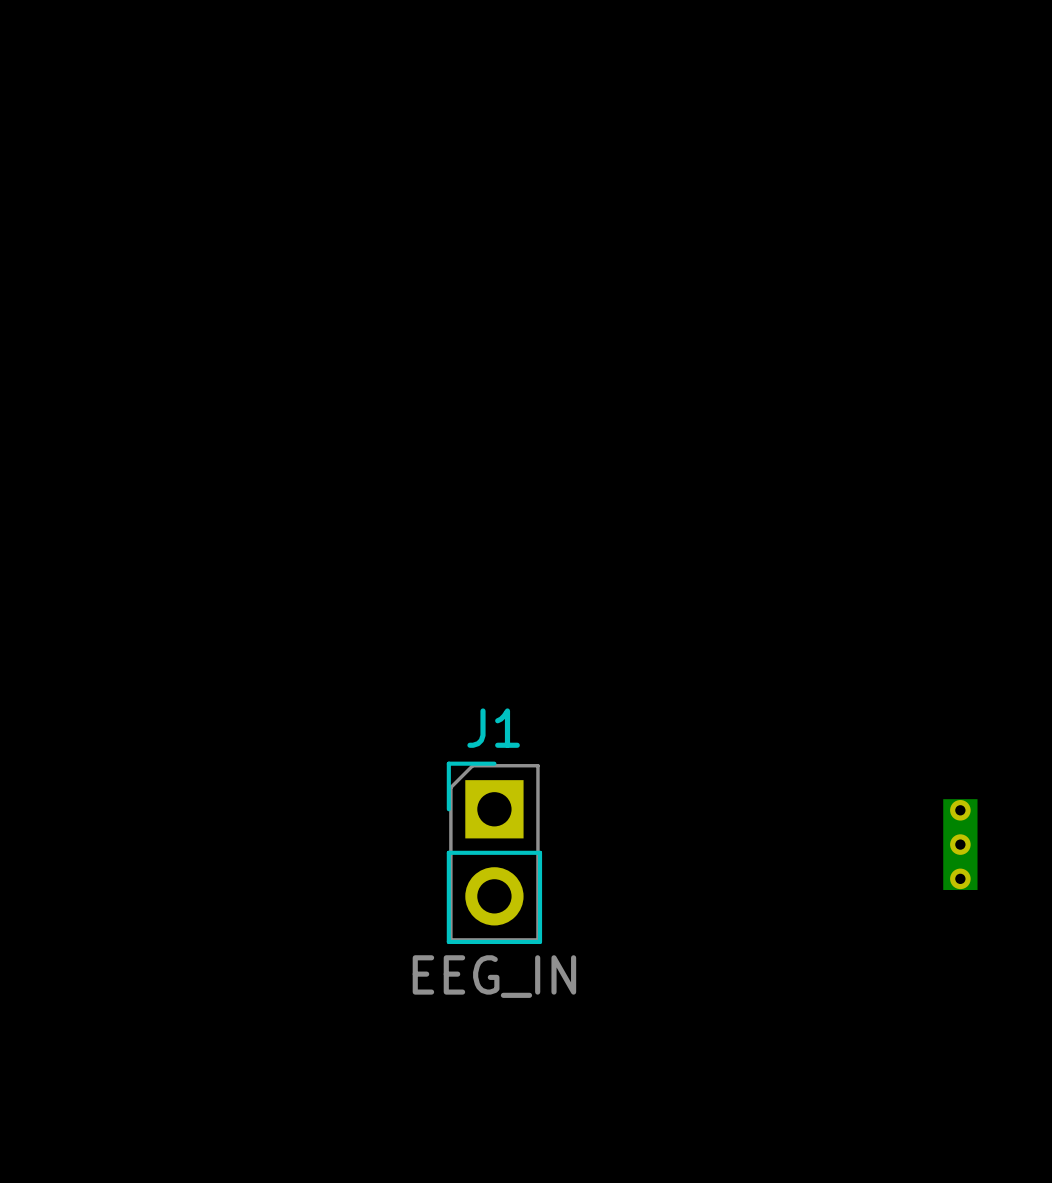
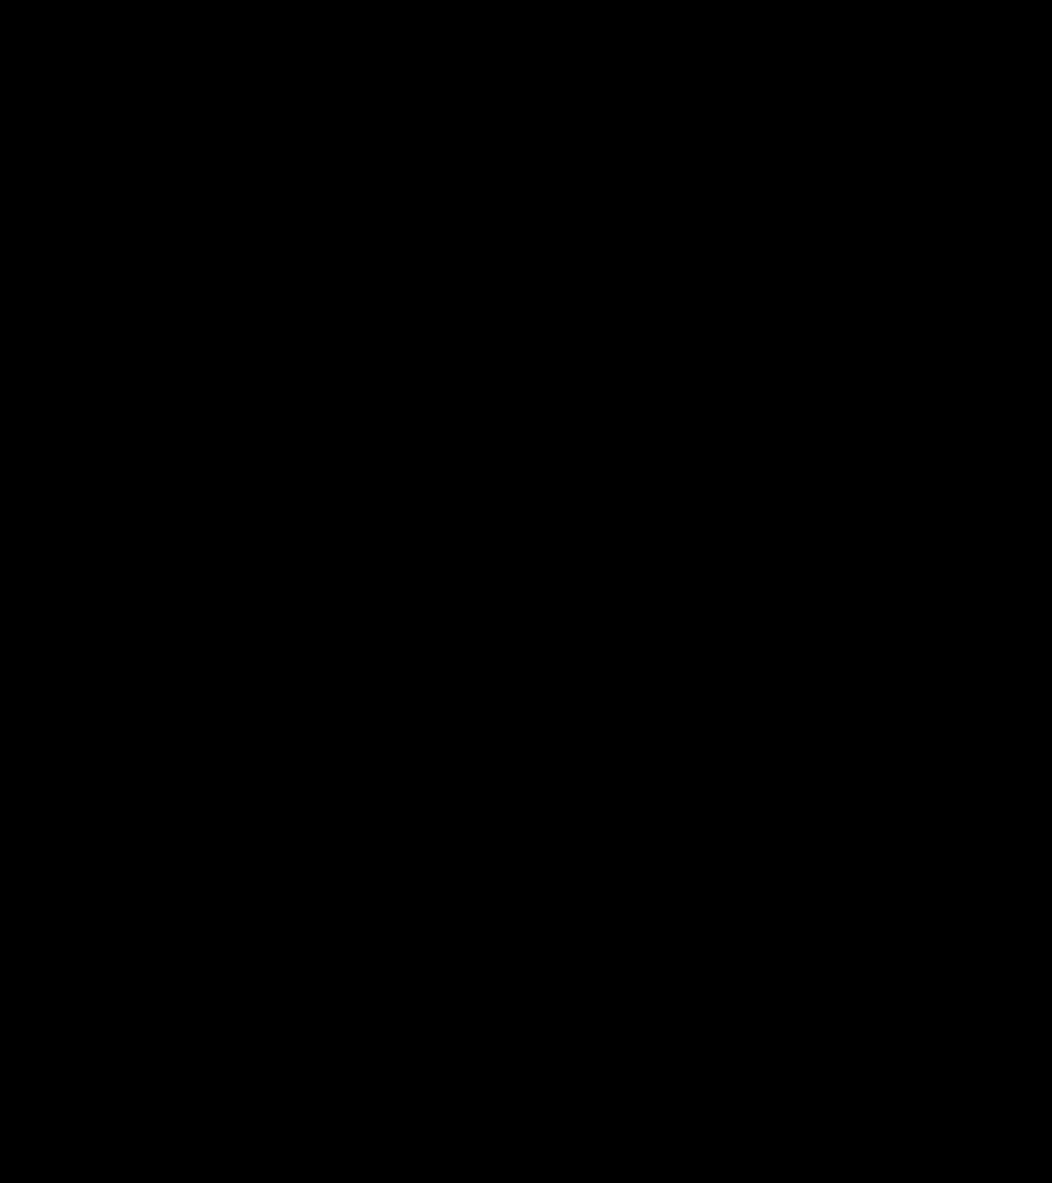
part: (960, 844) -> none
J1: EEG_IN (494, 852) -> none

